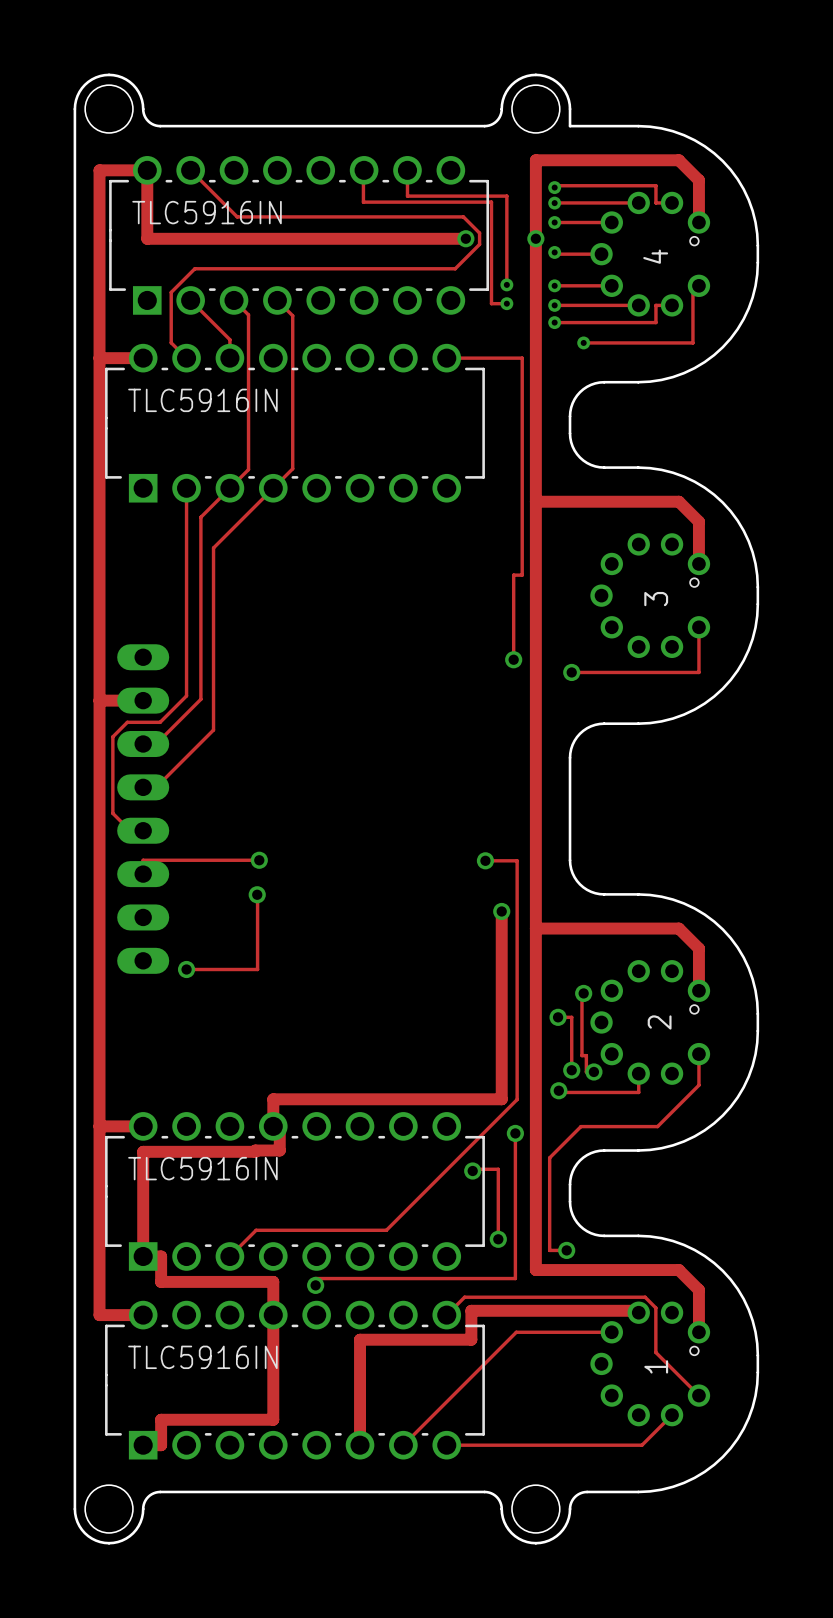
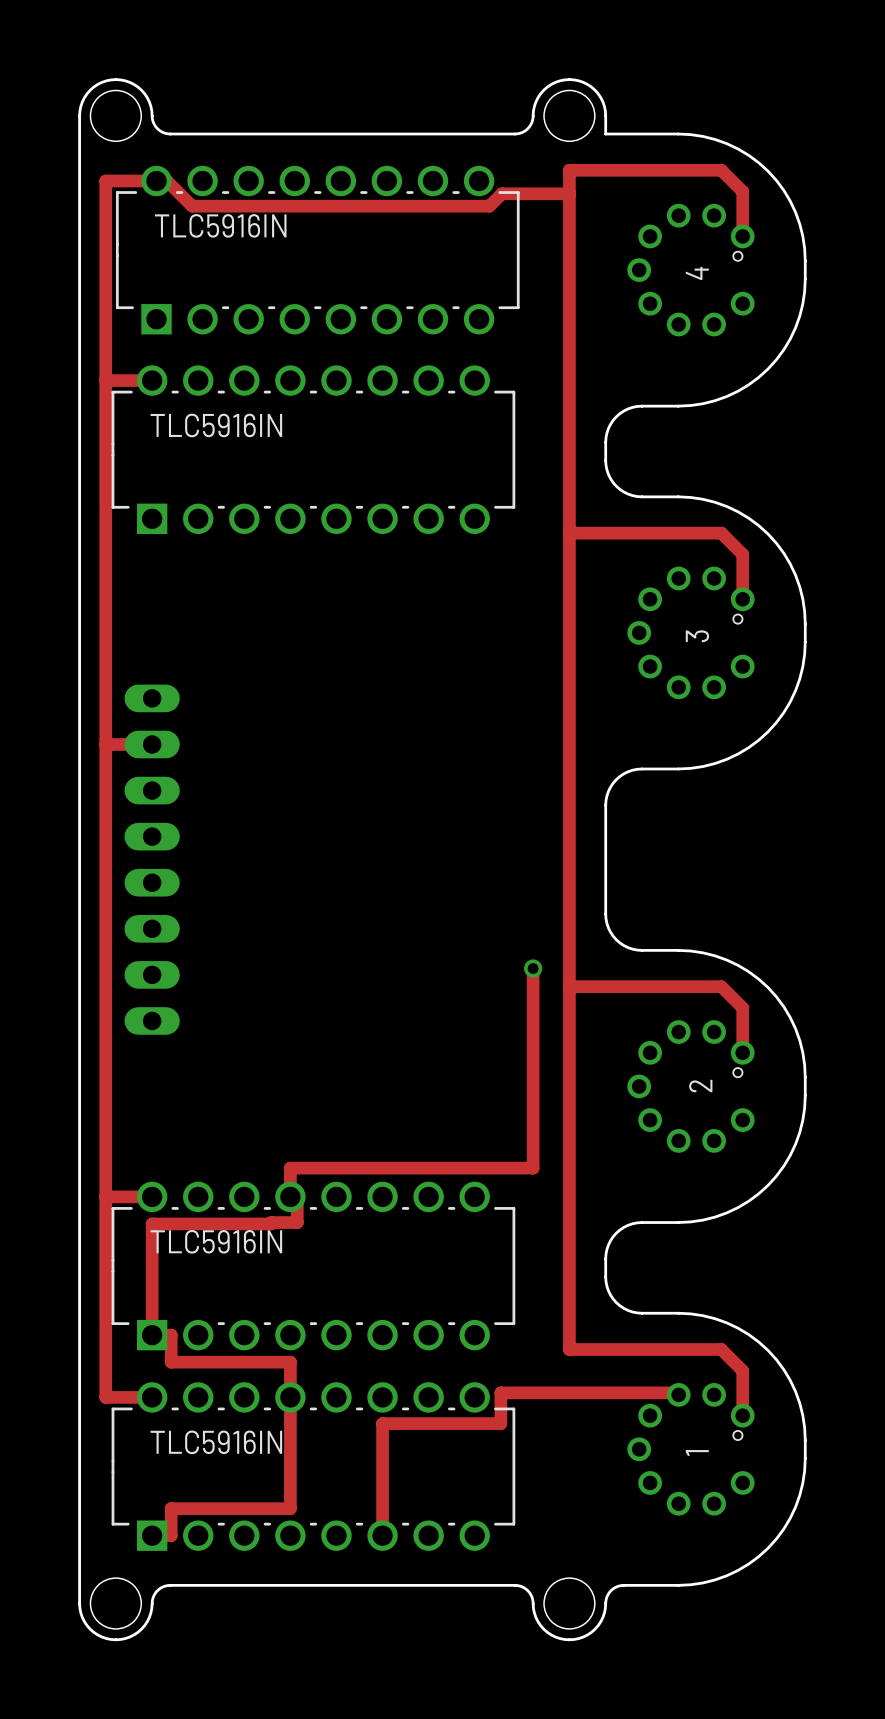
track: (147, 170) (147, 238) (465, 238) -> (156, 181) (166, 181) (192, 206) (489, 206) (501, 193) (569, 193)
track: (190, 170) (237, 216) (463, 216) (479, 233) (479, 244) (455, 268) (194, 268) (171, 292) (171, 342) (186, 358) -> none
track: (364, 170) (363, 202) (491, 202) (491, 303) (506, 303) -> none
track: (407, 170) (407, 196) (506, 196) (506, 284) -> none
track: (554, 187) (554, 185) (655, 185) (655, 202) (672, 202) -> none
via: (554, 187) -> none
track: (554, 202) (638, 202) -> none
via: (554, 203) -> none
track: (554, 222) (611, 222) -> none
via: (554, 222) -> none
via: (465, 238) -> none
via: (535, 238) -> none
track: (554, 252) (554, 254) (601, 254) -> none
via: (554, 252) -> none
via: (506, 284) -> none
track: (554, 285) (611, 285) -> none
via: (554, 285) -> none
track: (698, 285) (692, 285) (692, 342) (583, 342) -> none
track: (190, 300) (229, 339) (229, 358) -> none
track: (234, 300) (248, 314) (248, 469) (200, 517) (200, 699) (156, 744) (143, 744) -> none
track: (277, 300) (292, 315) (292, 468) (213, 548) (213, 730) (156, 787) (143, 787) -> none
via: (506, 303) -> none
track: (554, 305) (638, 305) -> none
via: (554, 305) -> none
track: (672, 305) (655, 305) (655, 322) (554, 322) -> none
via: (554, 322) -> none
via: (583, 342) -> none
track: (446, 358) (522, 358) (522, 575) (513, 575) (513, 659) -> none
track: (186, 488) (186, 695) (160, 722) (127, 722) (112, 736) (112, 813) (130, 830) (143, 830) -> none
track: (698, 627) (698, 672) (571, 672) -> none
via: (513, 659) -> none
via: (571, 672) -> none
track: (259, 860) (143, 860) (143, 874) -> none
via: (259, 860) -> none
track: (485, 860) (517, 860) (517, 1099) (386, 1230) (256, 1230) (229, 1256) -> none
via: (485, 860) -> none
track: (257, 894) (257, 969) (186, 969) -> none
via: (257, 894) -> none
via: (186, 969) -> none
track: (583, 993) (581, 993) (581, 1055) (586, 1055) (586, 1071) (593, 1071) -> none
via: (583, 993) -> none
track: (558, 1017) (571, 1017) (571, 1070) -> none
via: (558, 1017) -> none
track: (698, 1054) (698, 1085) (657, 1126) (580, 1126) (549, 1157) (549, 1250) (566, 1250) -> none
via: (571, 1070) -> none
via: (593, 1071) -> none
track: (638, 1073) (638, 1092) (558, 1092) (558, 1090) -> none
via: (558, 1090) -> none
track: (515, 1133) (515, 1278) (315, 1278) (315, 1285) -> none
via: (515, 1133) -> none
track: (472, 1171) (472, 1169) (498, 1169) (498, 1239) -> none
via: (472, 1171) -> none
via: (498, 1239) -> none
via: (566, 1250) -> none
via: (315, 1285) -> none
track: (446, 1315) (464, 1297) (645, 1297) (655, 1307) (655, 1352) (698, 1395) -> none
track: (611, 1332) (516, 1332) (403, 1445) -> none
track: (672, 1415) (641, 1445) (446, 1445) -> none

